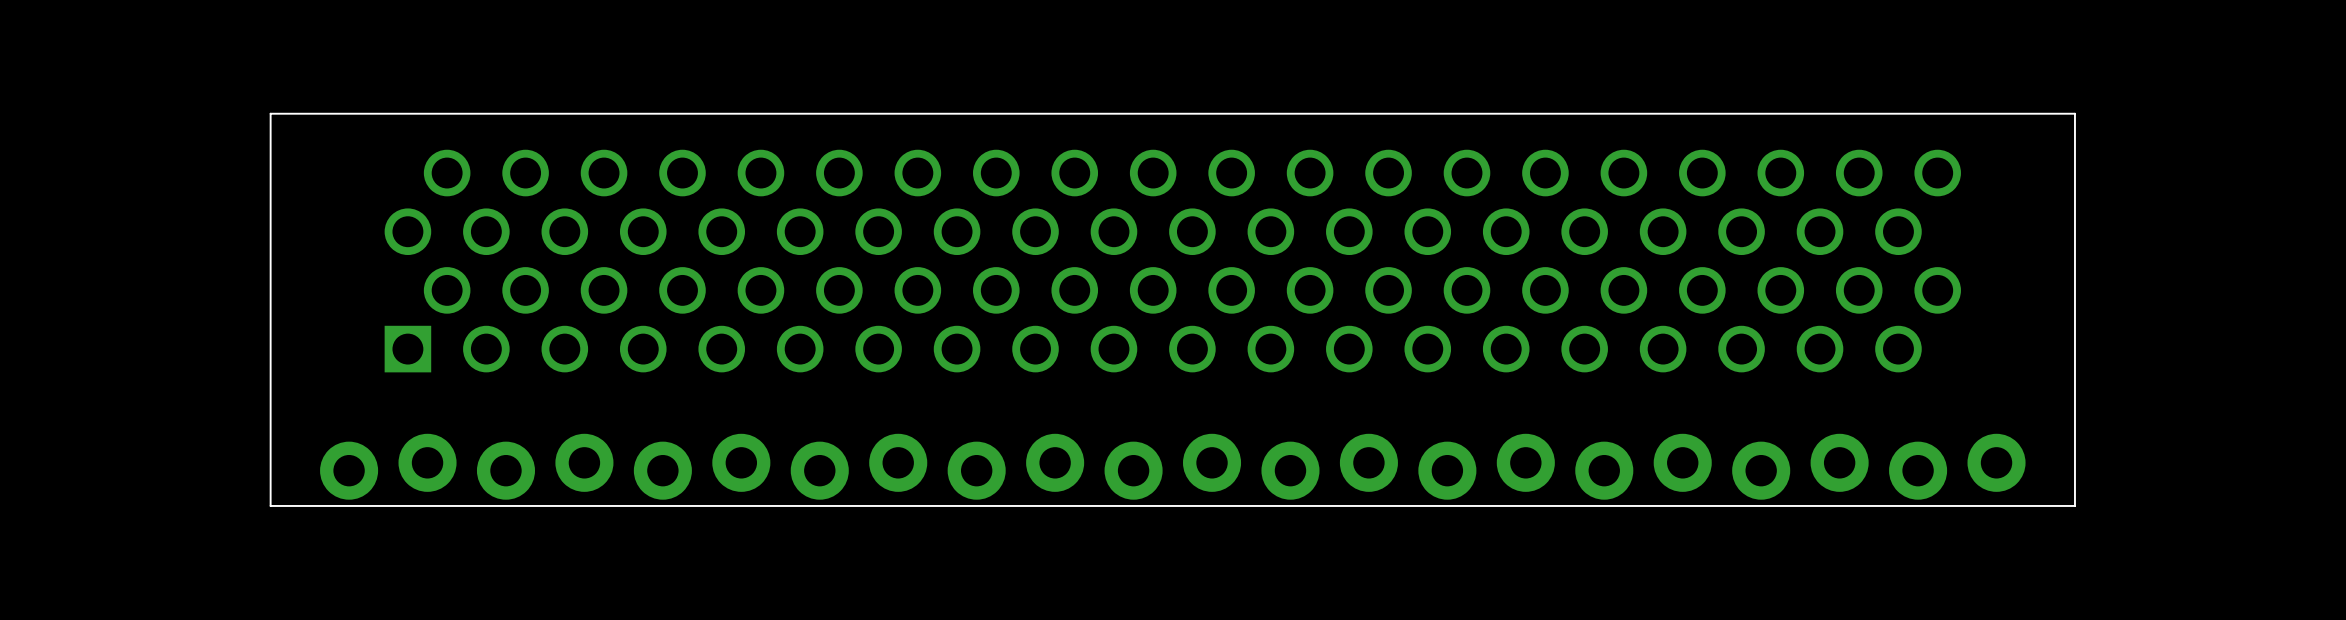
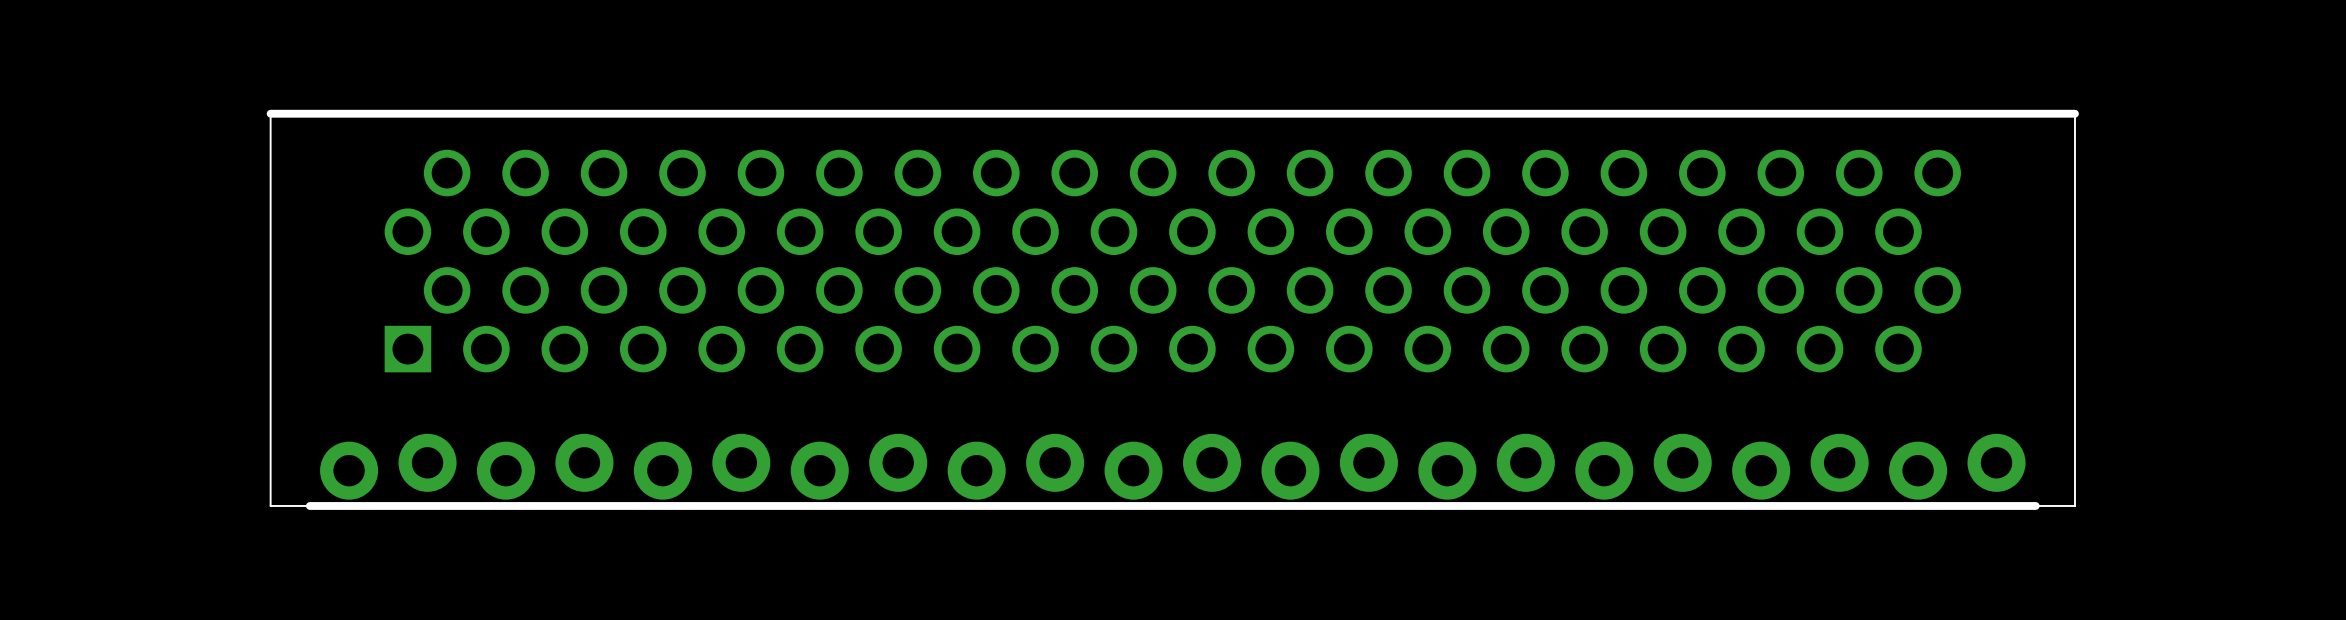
board edge width: thin (2074, 113) (270, 113) -> thick (2074, 113) (270, 113)
board edge width: thin (2035, 505) (309, 505) -> thick (2035, 505) (309, 505)

